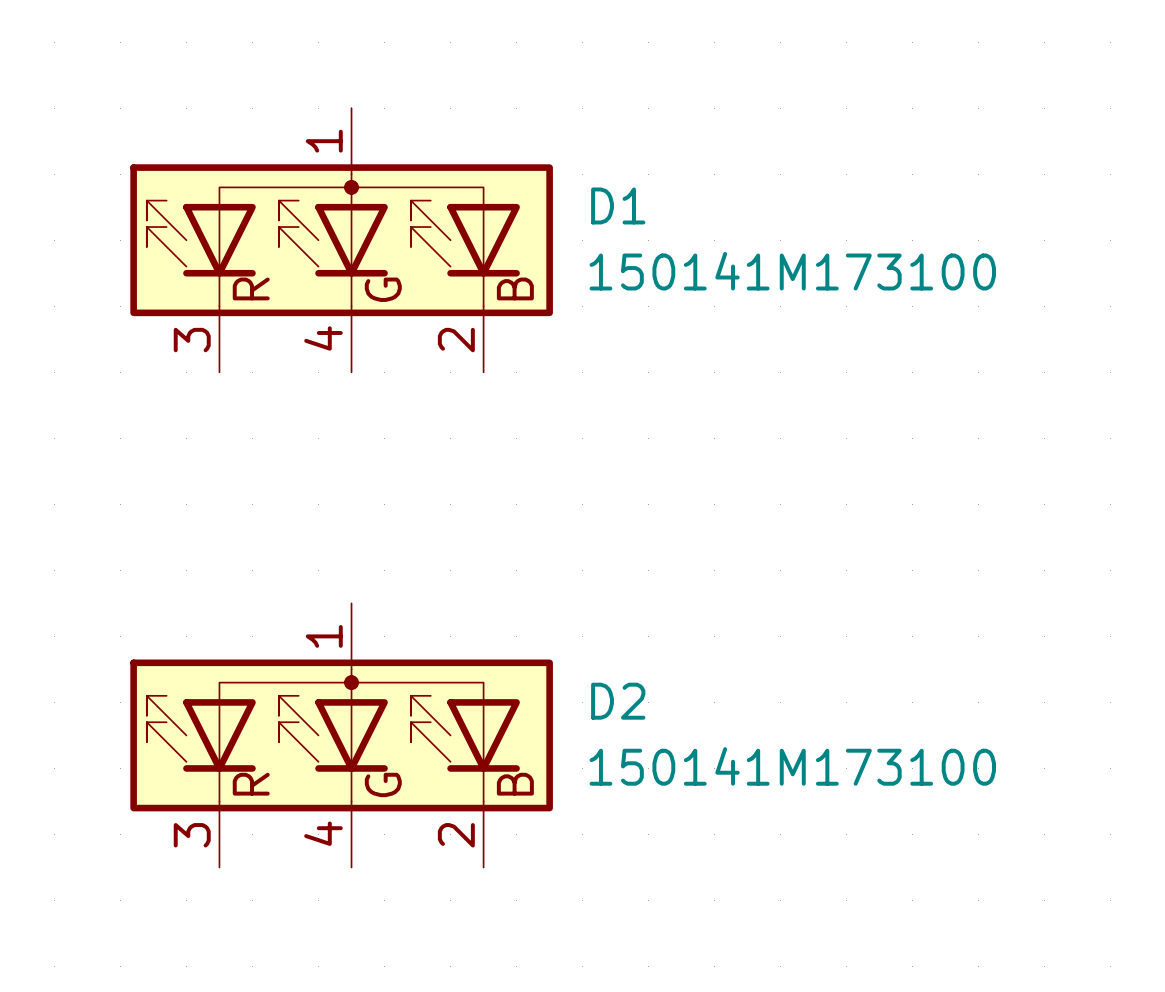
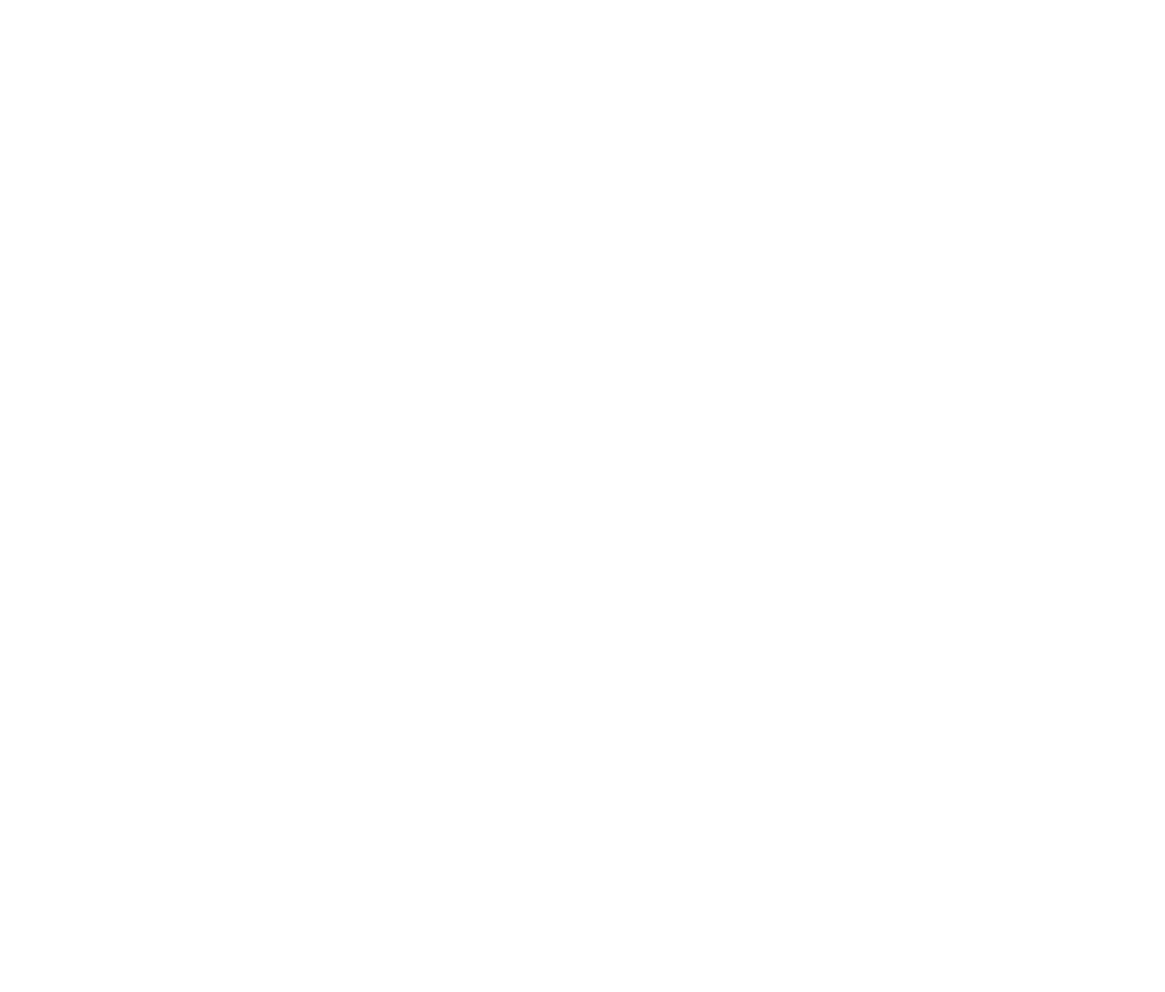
D1: 150141M173100 (341, 240) -> none
D2: 150141M173100 (341, 735) -> none

